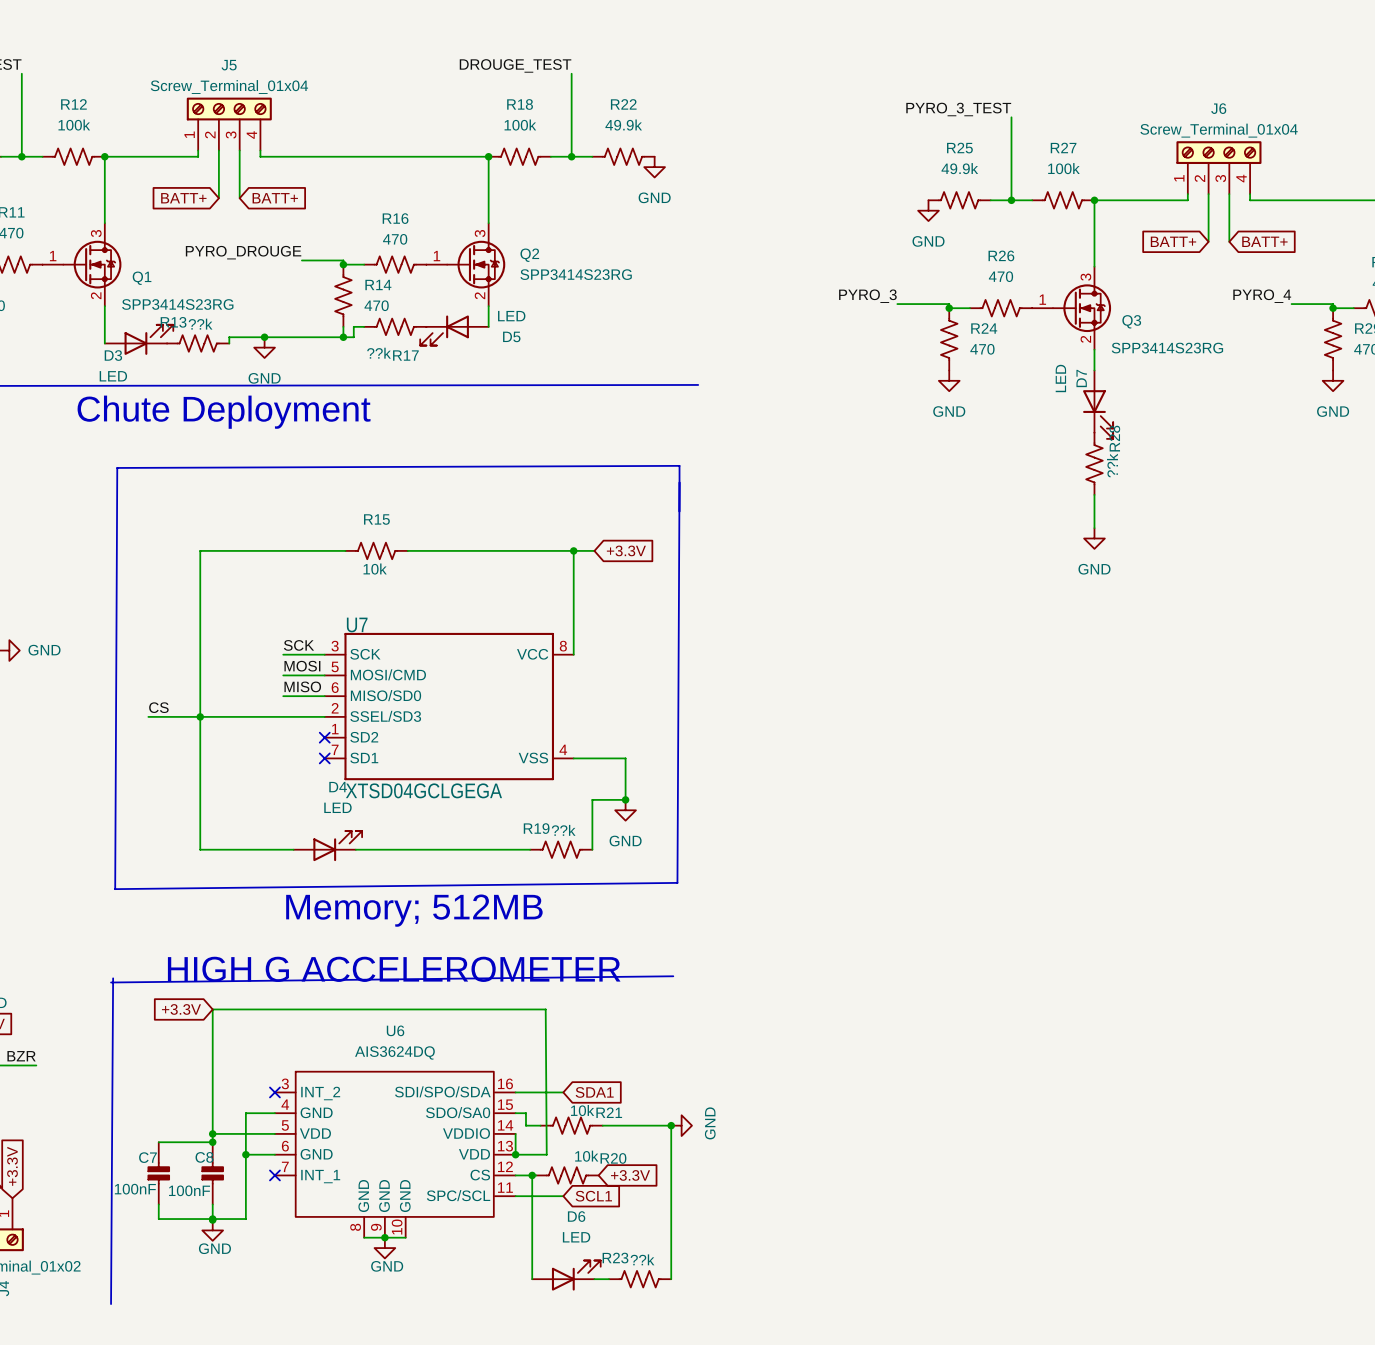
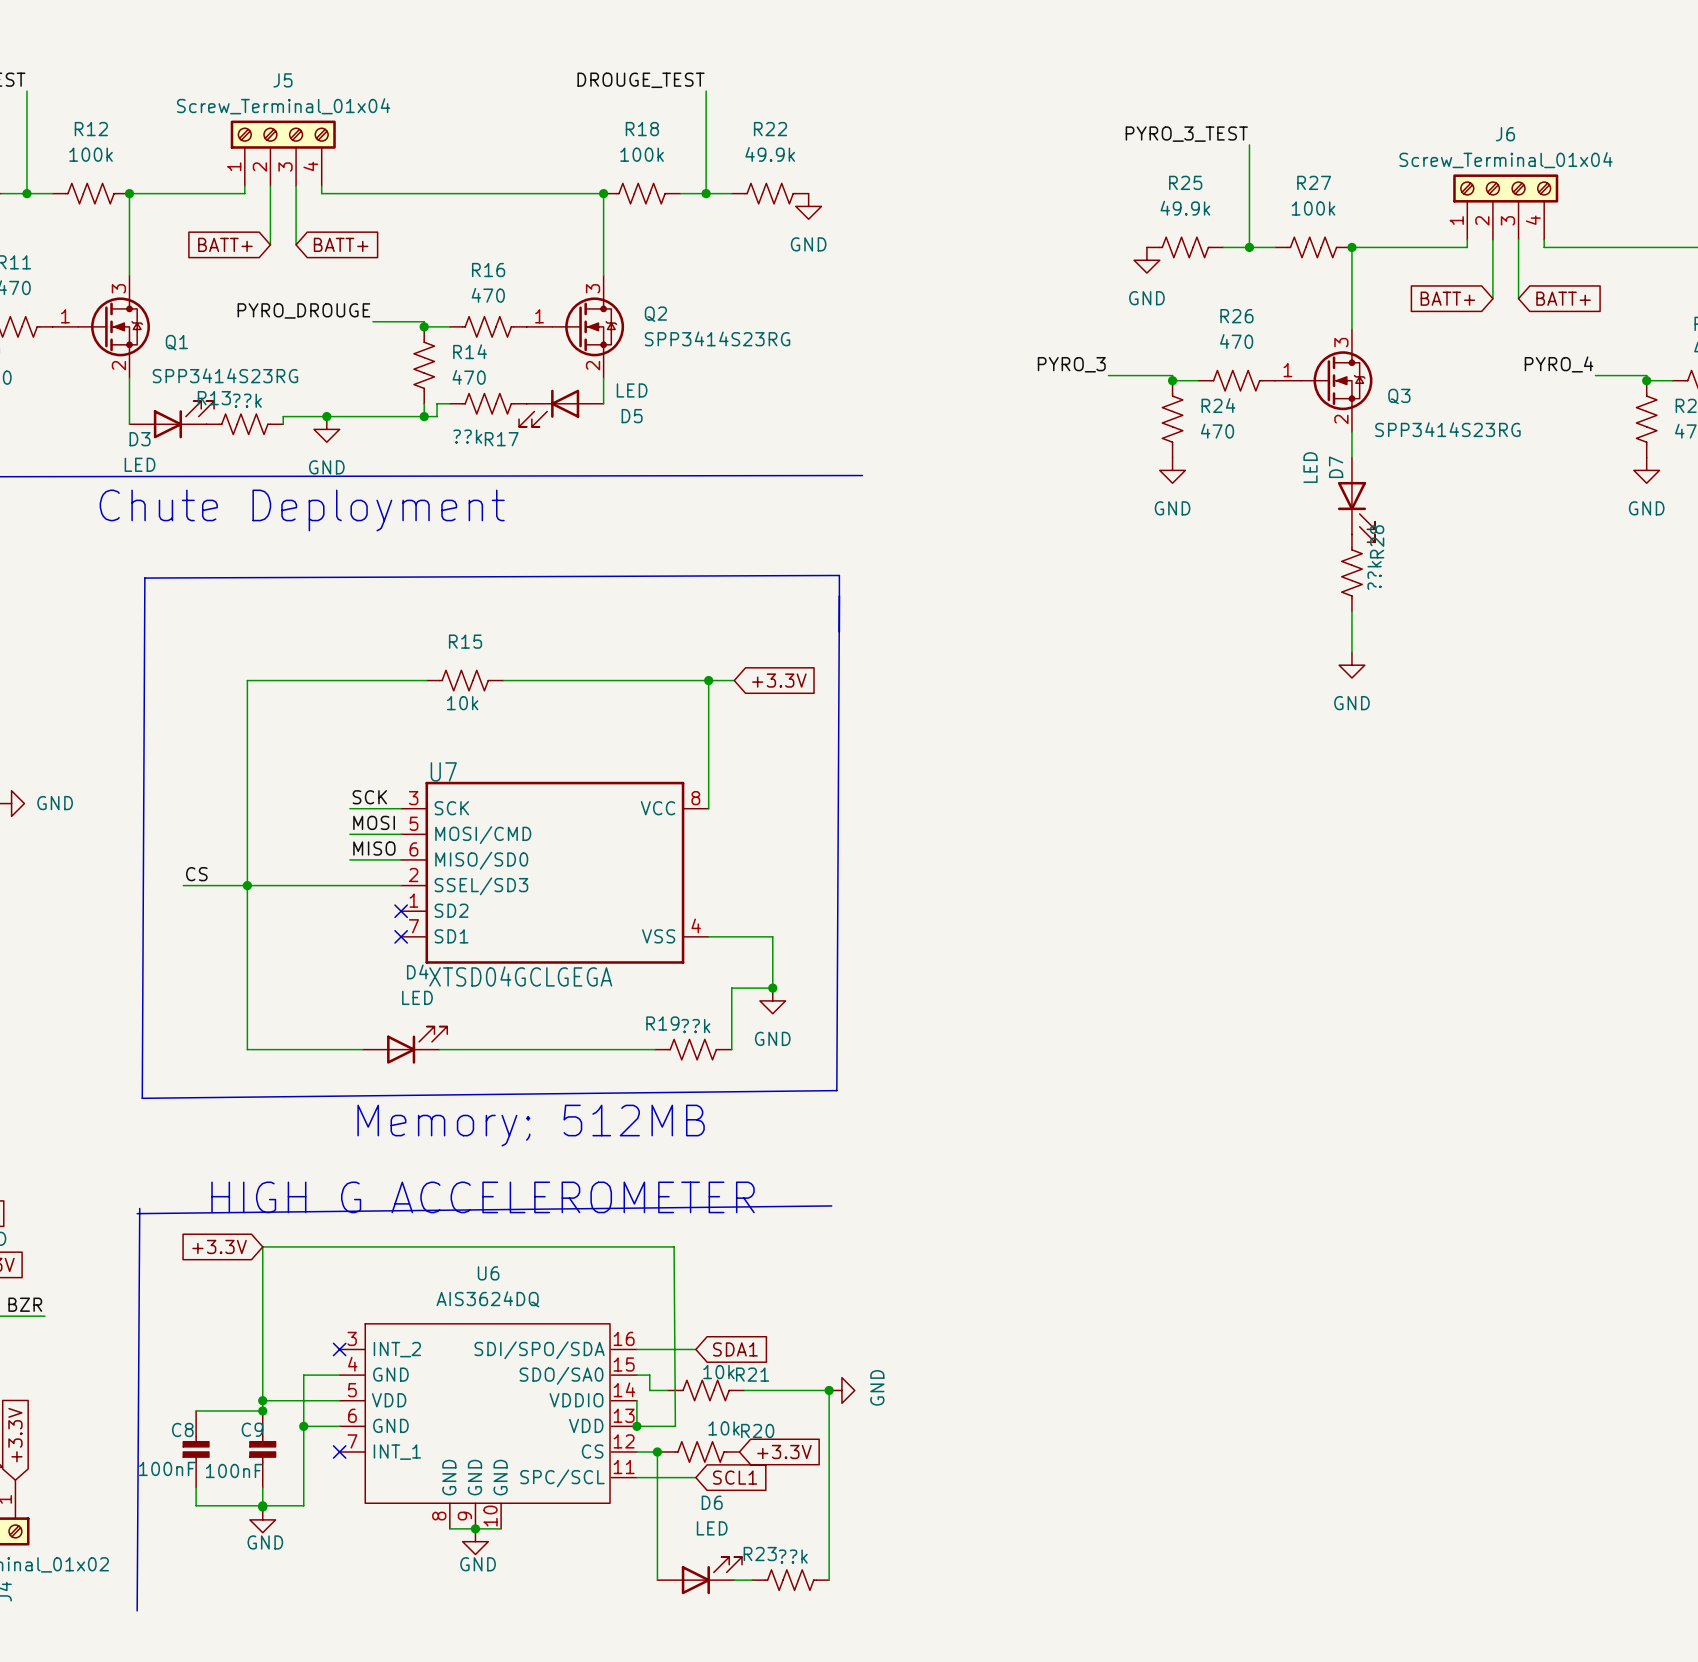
C7 name: C7 (147, 1157) -> C8 (182, 1429)
C8 name: C8 (204, 1157) -> C9 (252, 1429)

